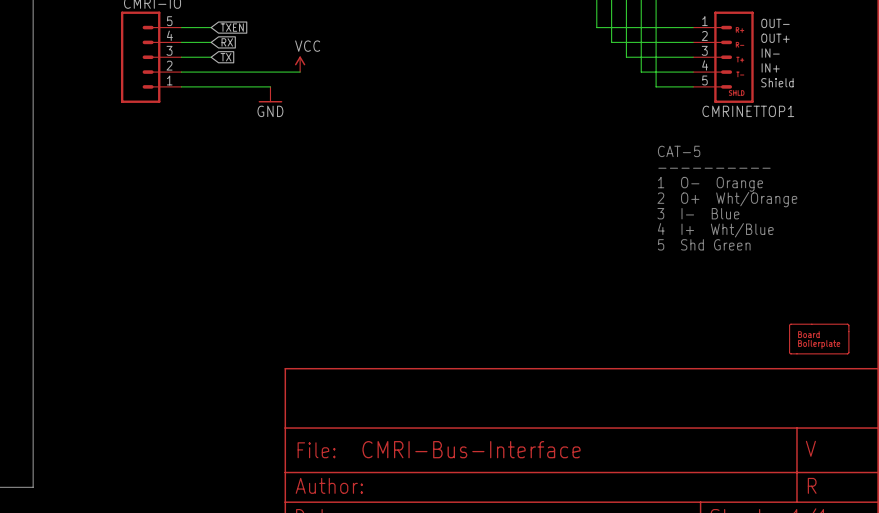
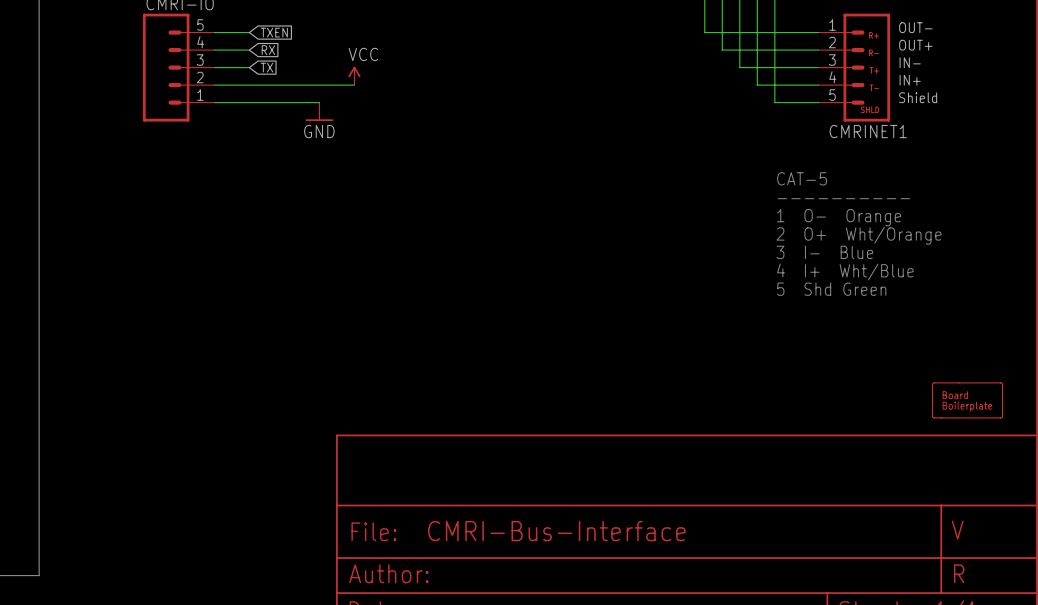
CMRINETTOP1 name: CMRINETTOP1 (748, 111) -> CMRINET1 (868, 131)

